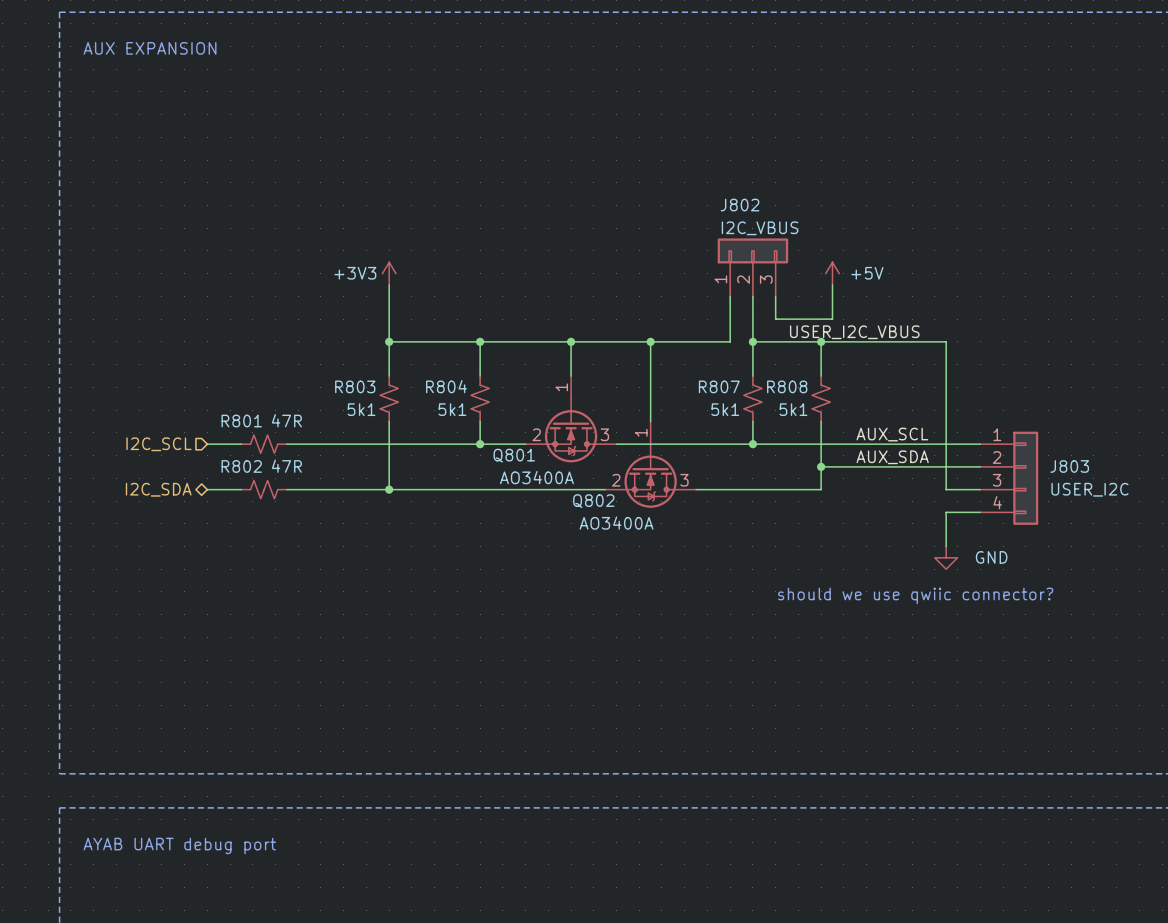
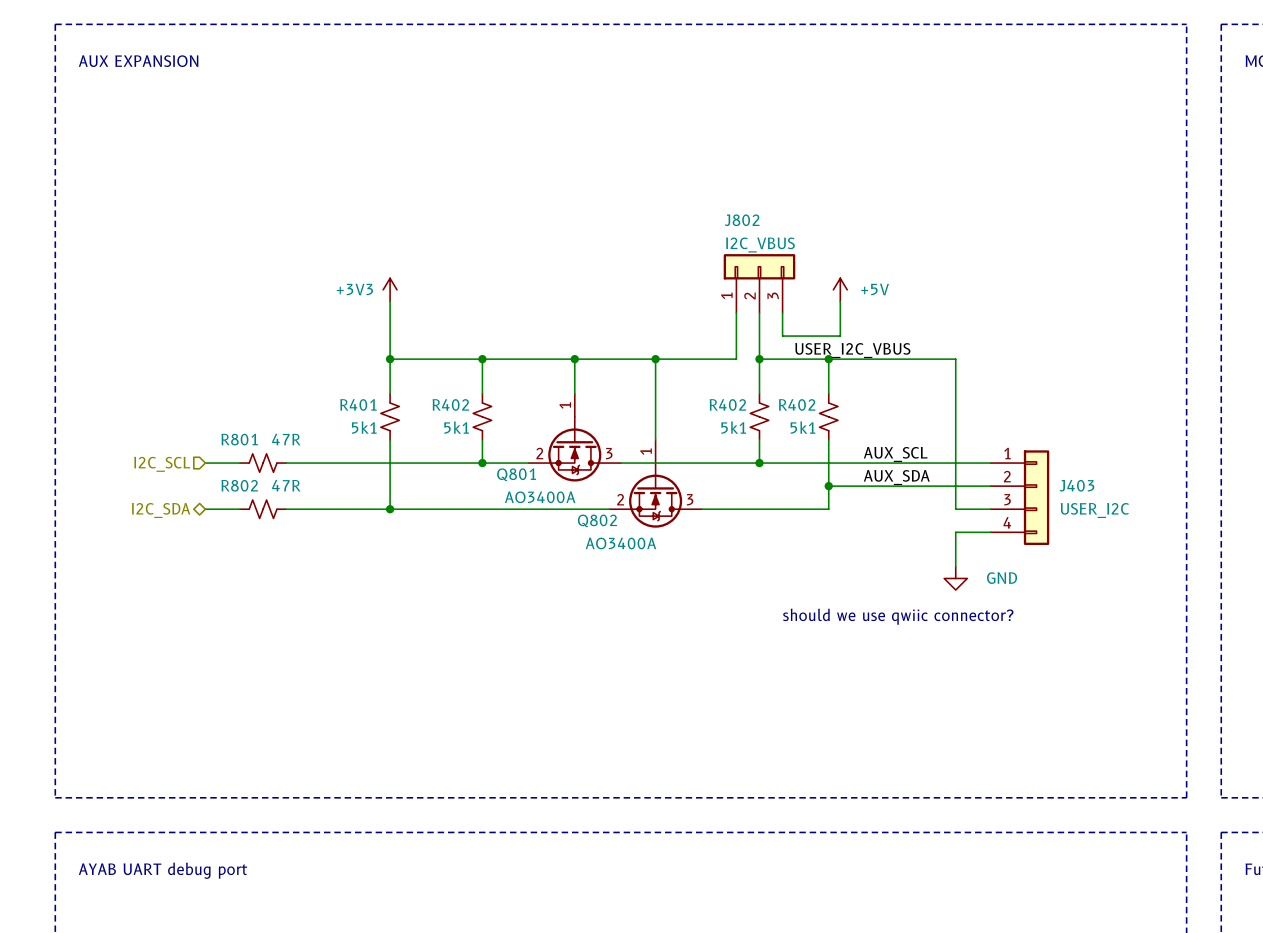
R803 name: R803 (355, 386) -> R401 (358, 404)
R804 name: R804 (446, 386) -> R402 (450, 404)
R807 name: R807 (719, 386) -> R402 (727, 404)
R808 name: R808 (787, 386) -> R402 (797, 404)
J803 name: J803 (1069, 466) -> J403 (1076, 485)

